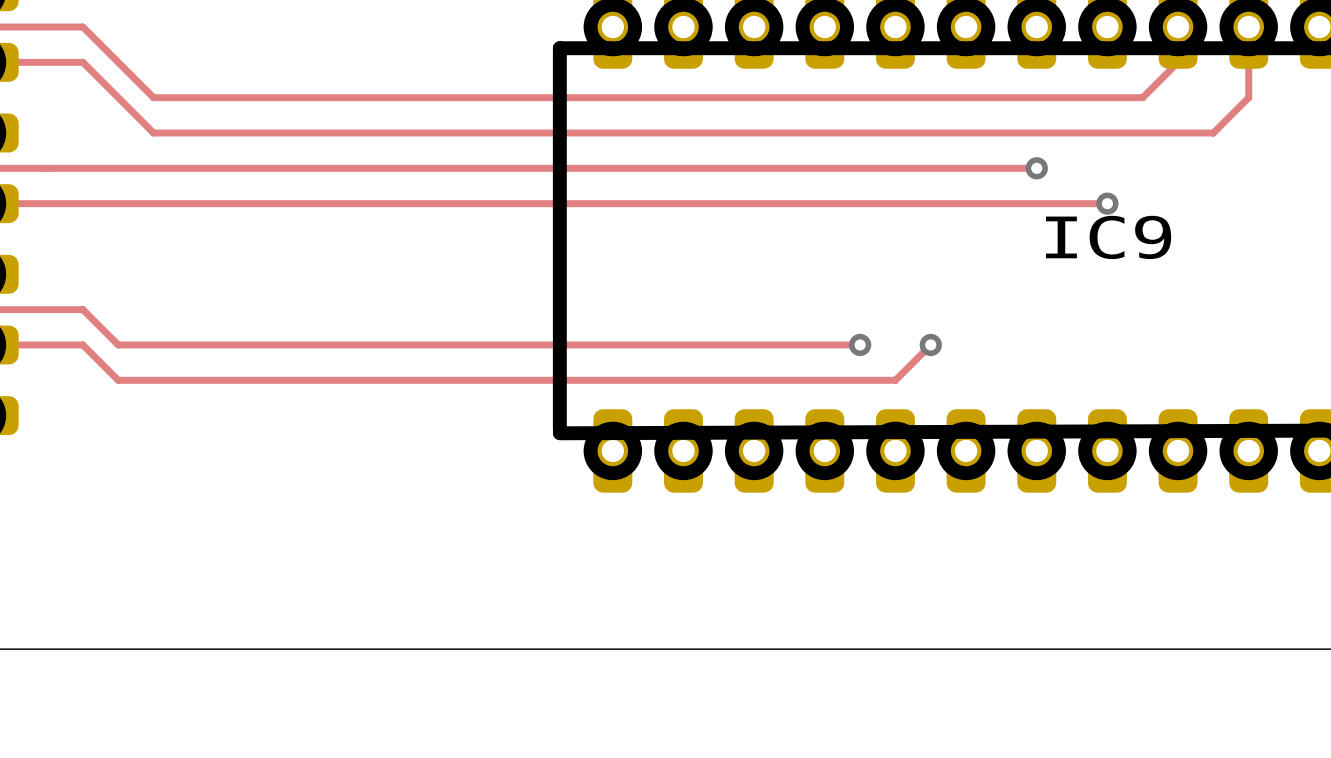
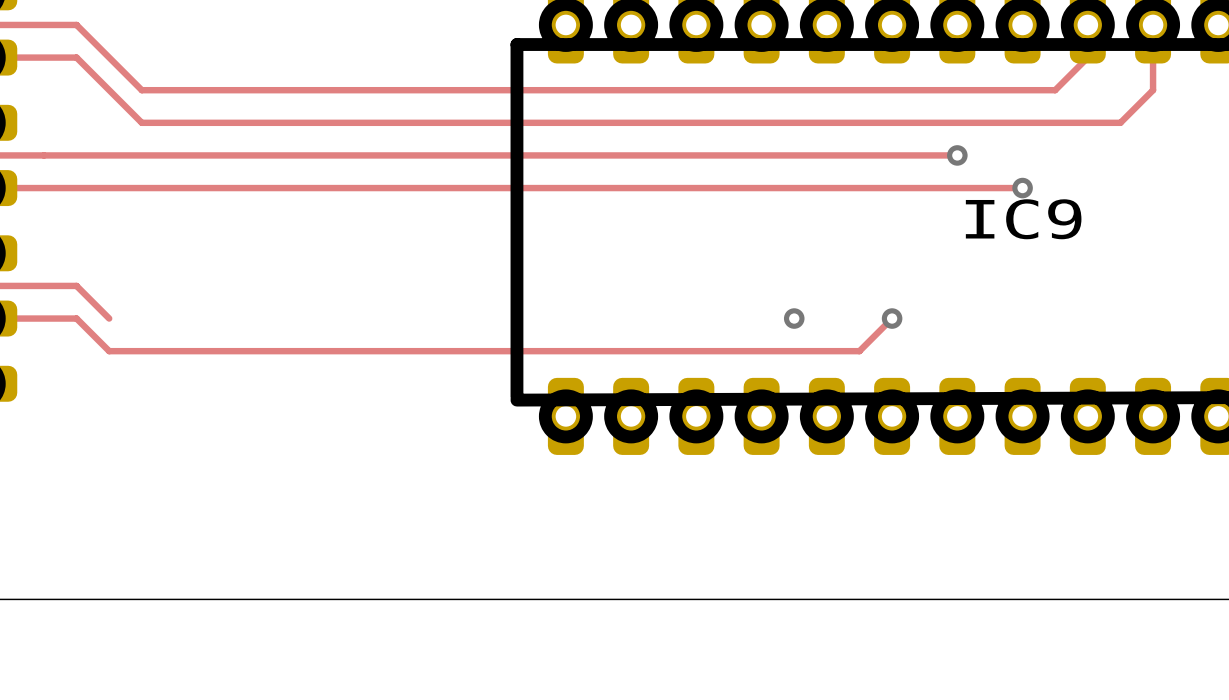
track: (118, 344) (860, 344) -> none
track: (930, 344) (895, 380) -> (892, 318) (859, 351) (826, 351)
via position: (930, 344) -> (892, 318)

